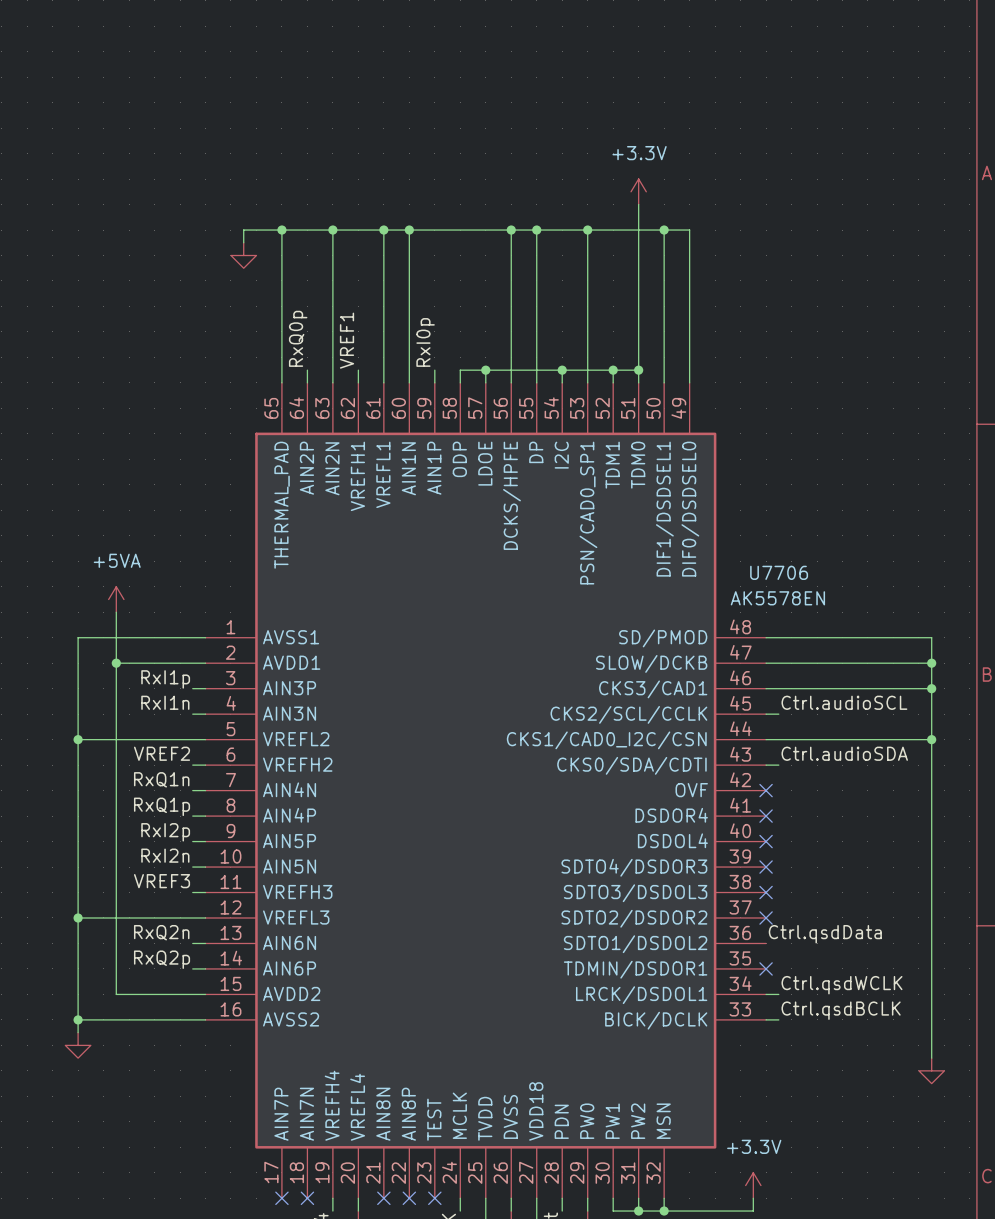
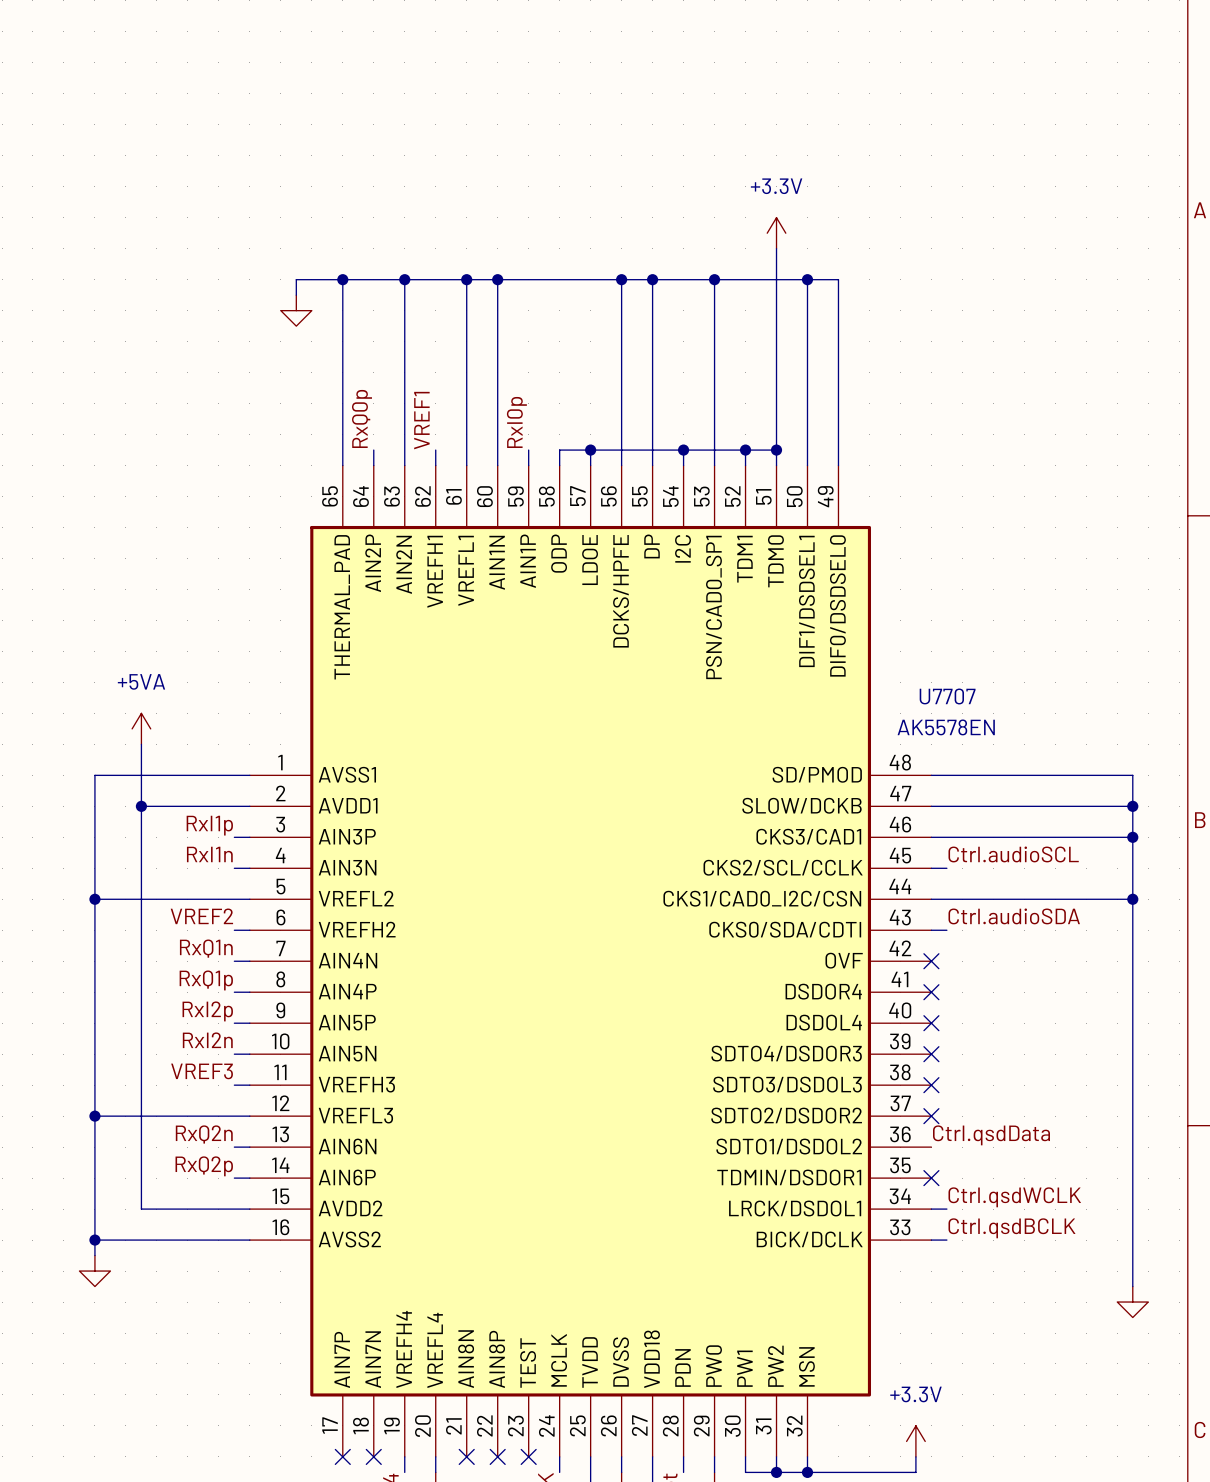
U7706 name: U7706 (779, 572) -> U7707 (947, 696)

